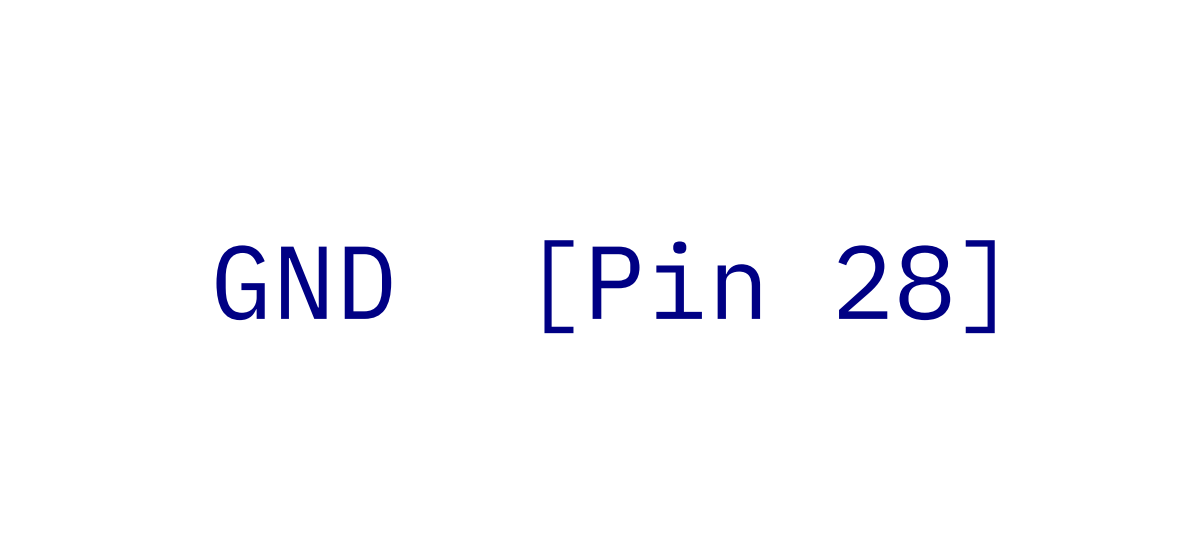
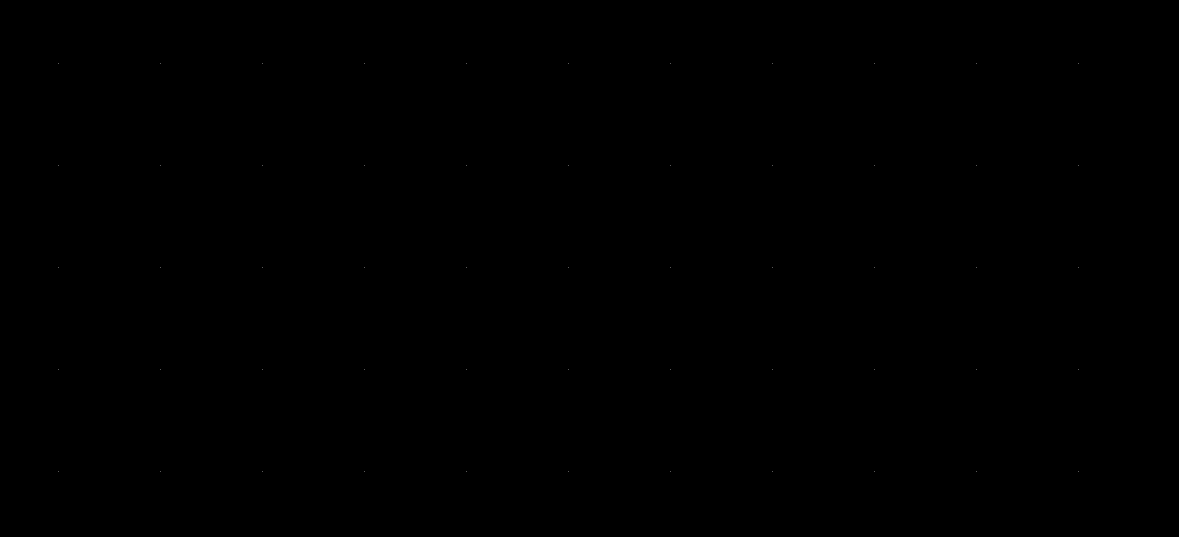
text: GND [Pin 28] (605, 286) -> none

